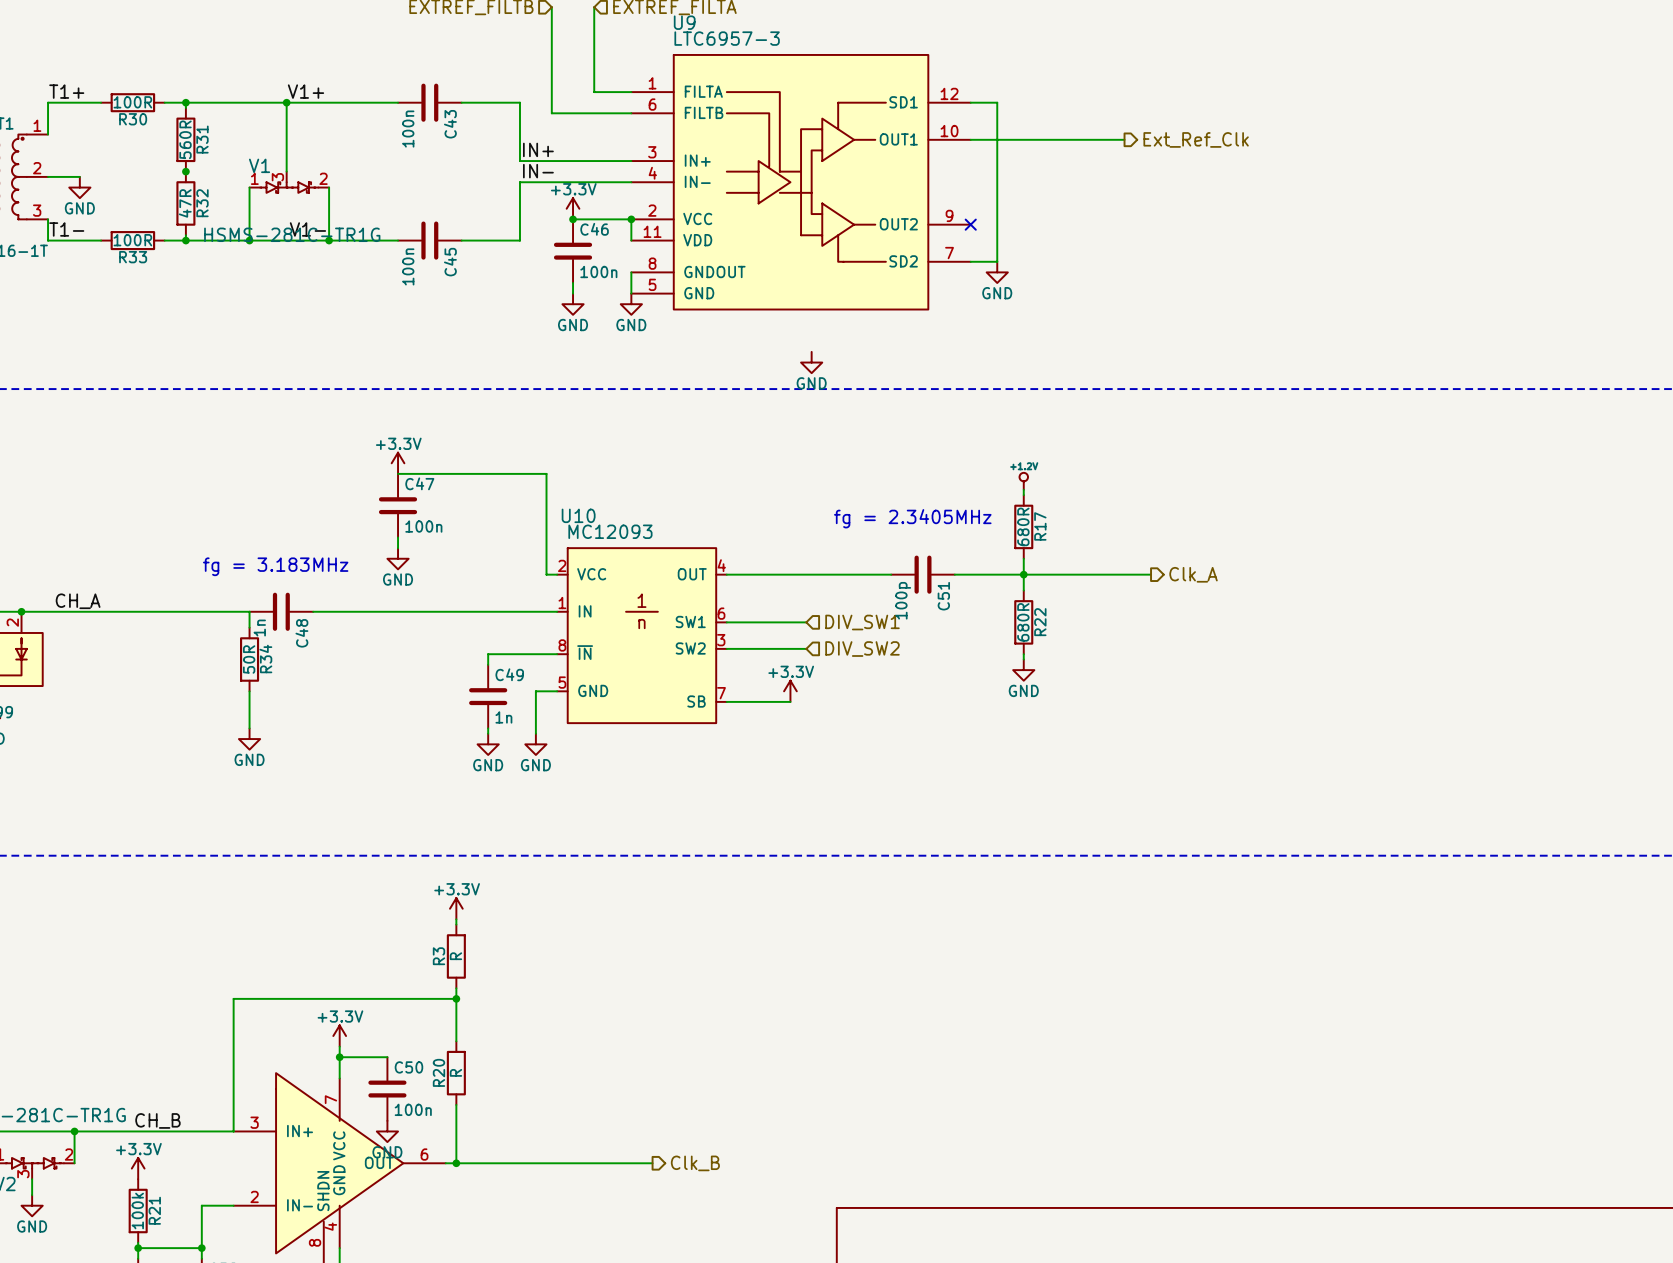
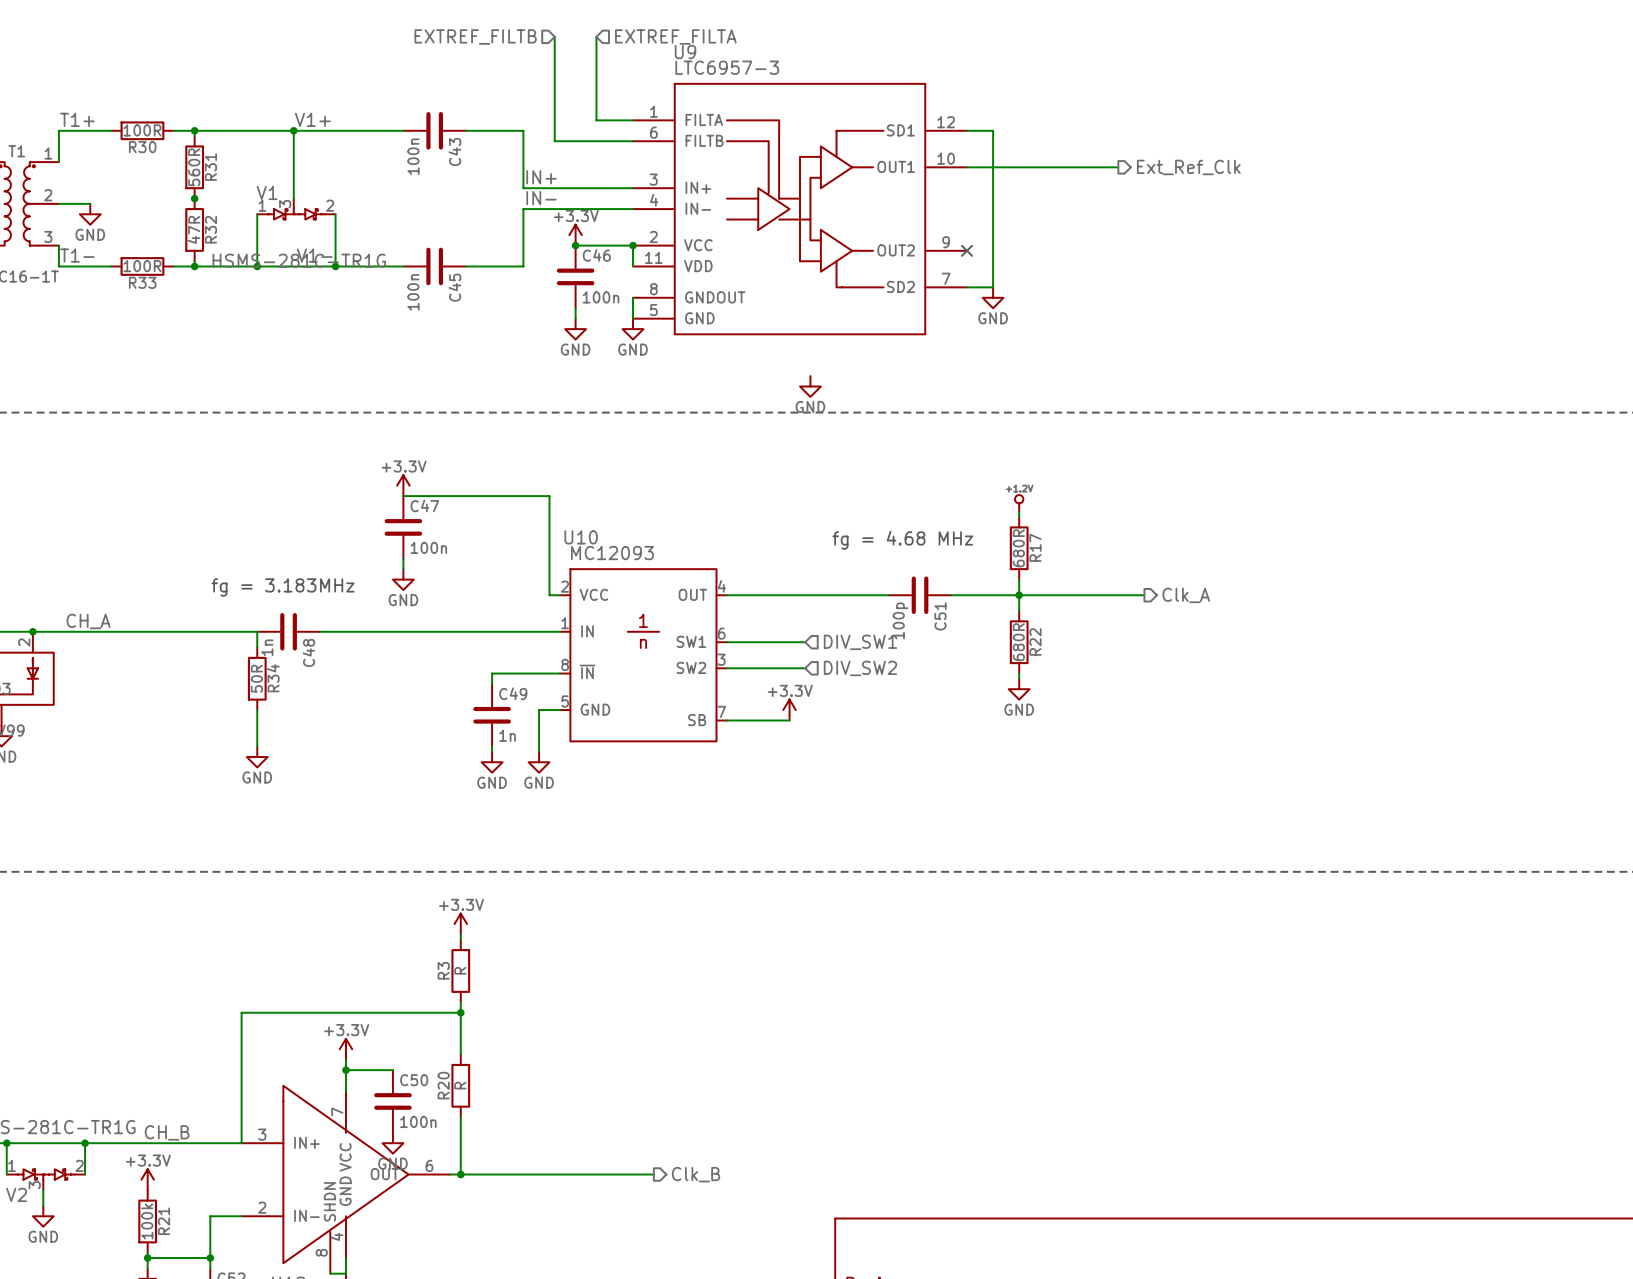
text: fg = 2.3405MHz (912, 518) -> fg = 4.68 MHz (902, 540)

